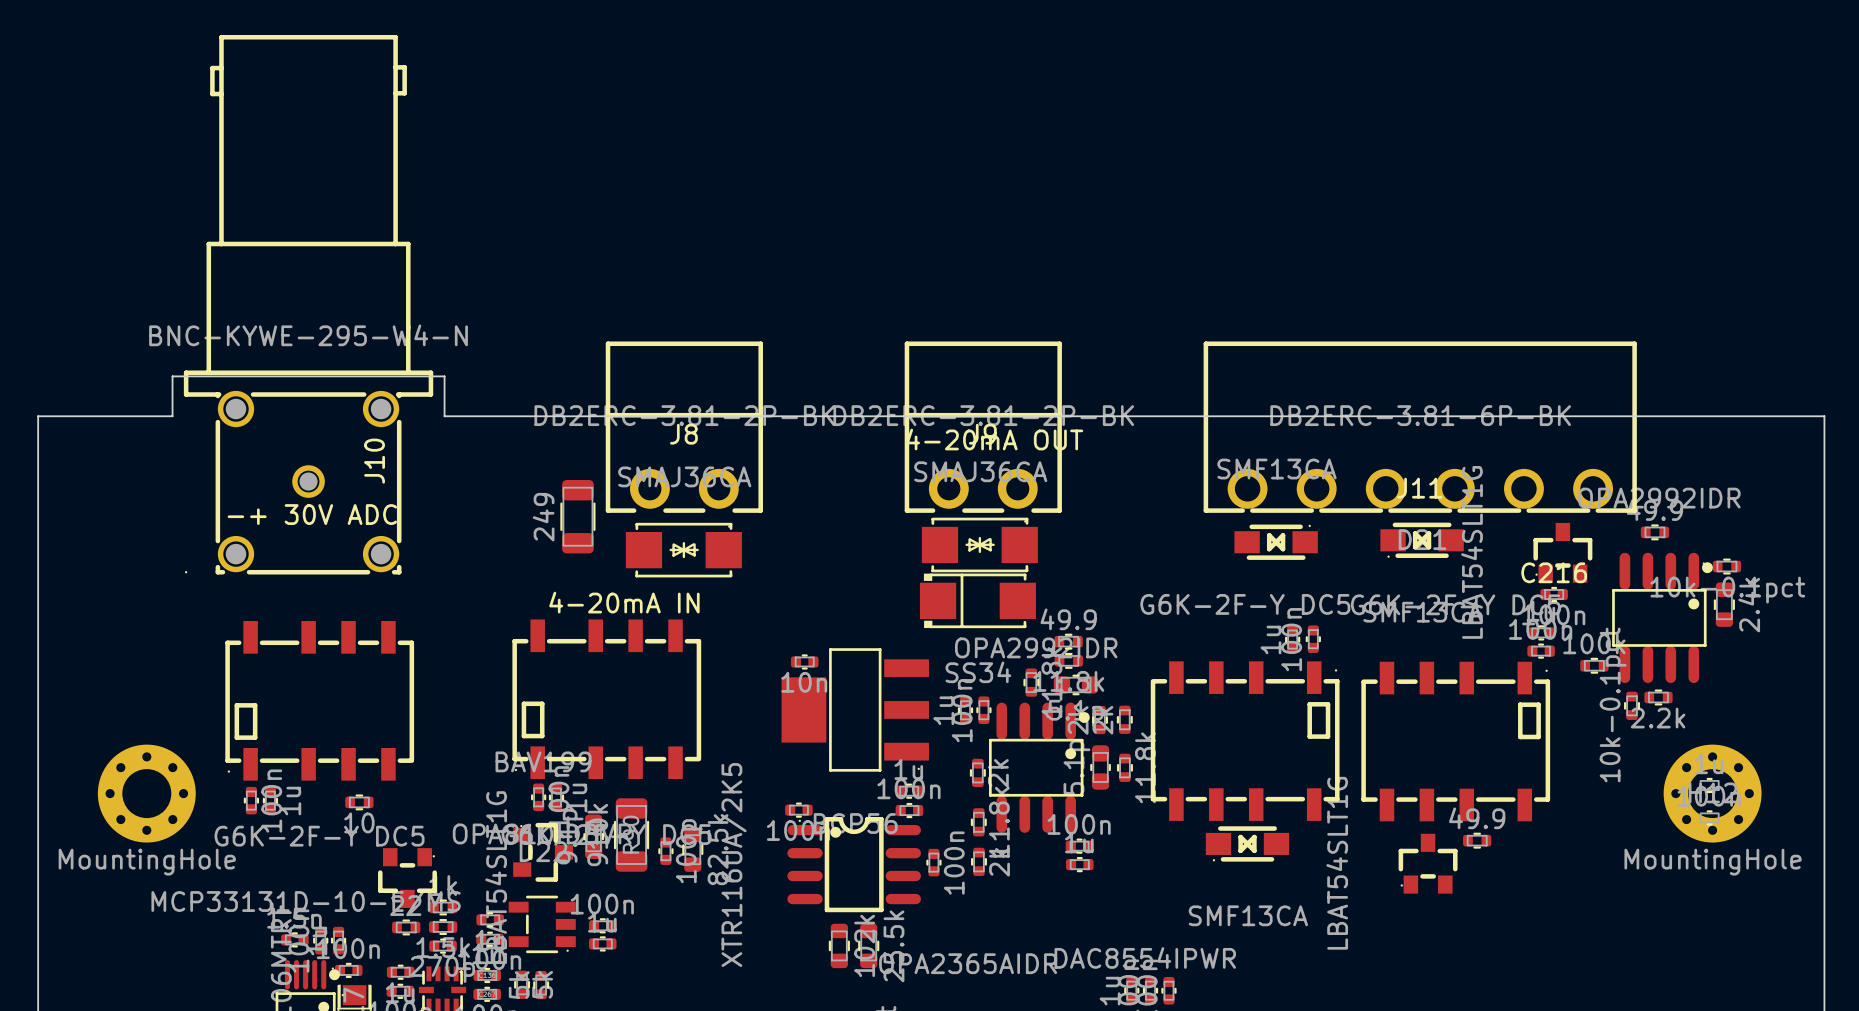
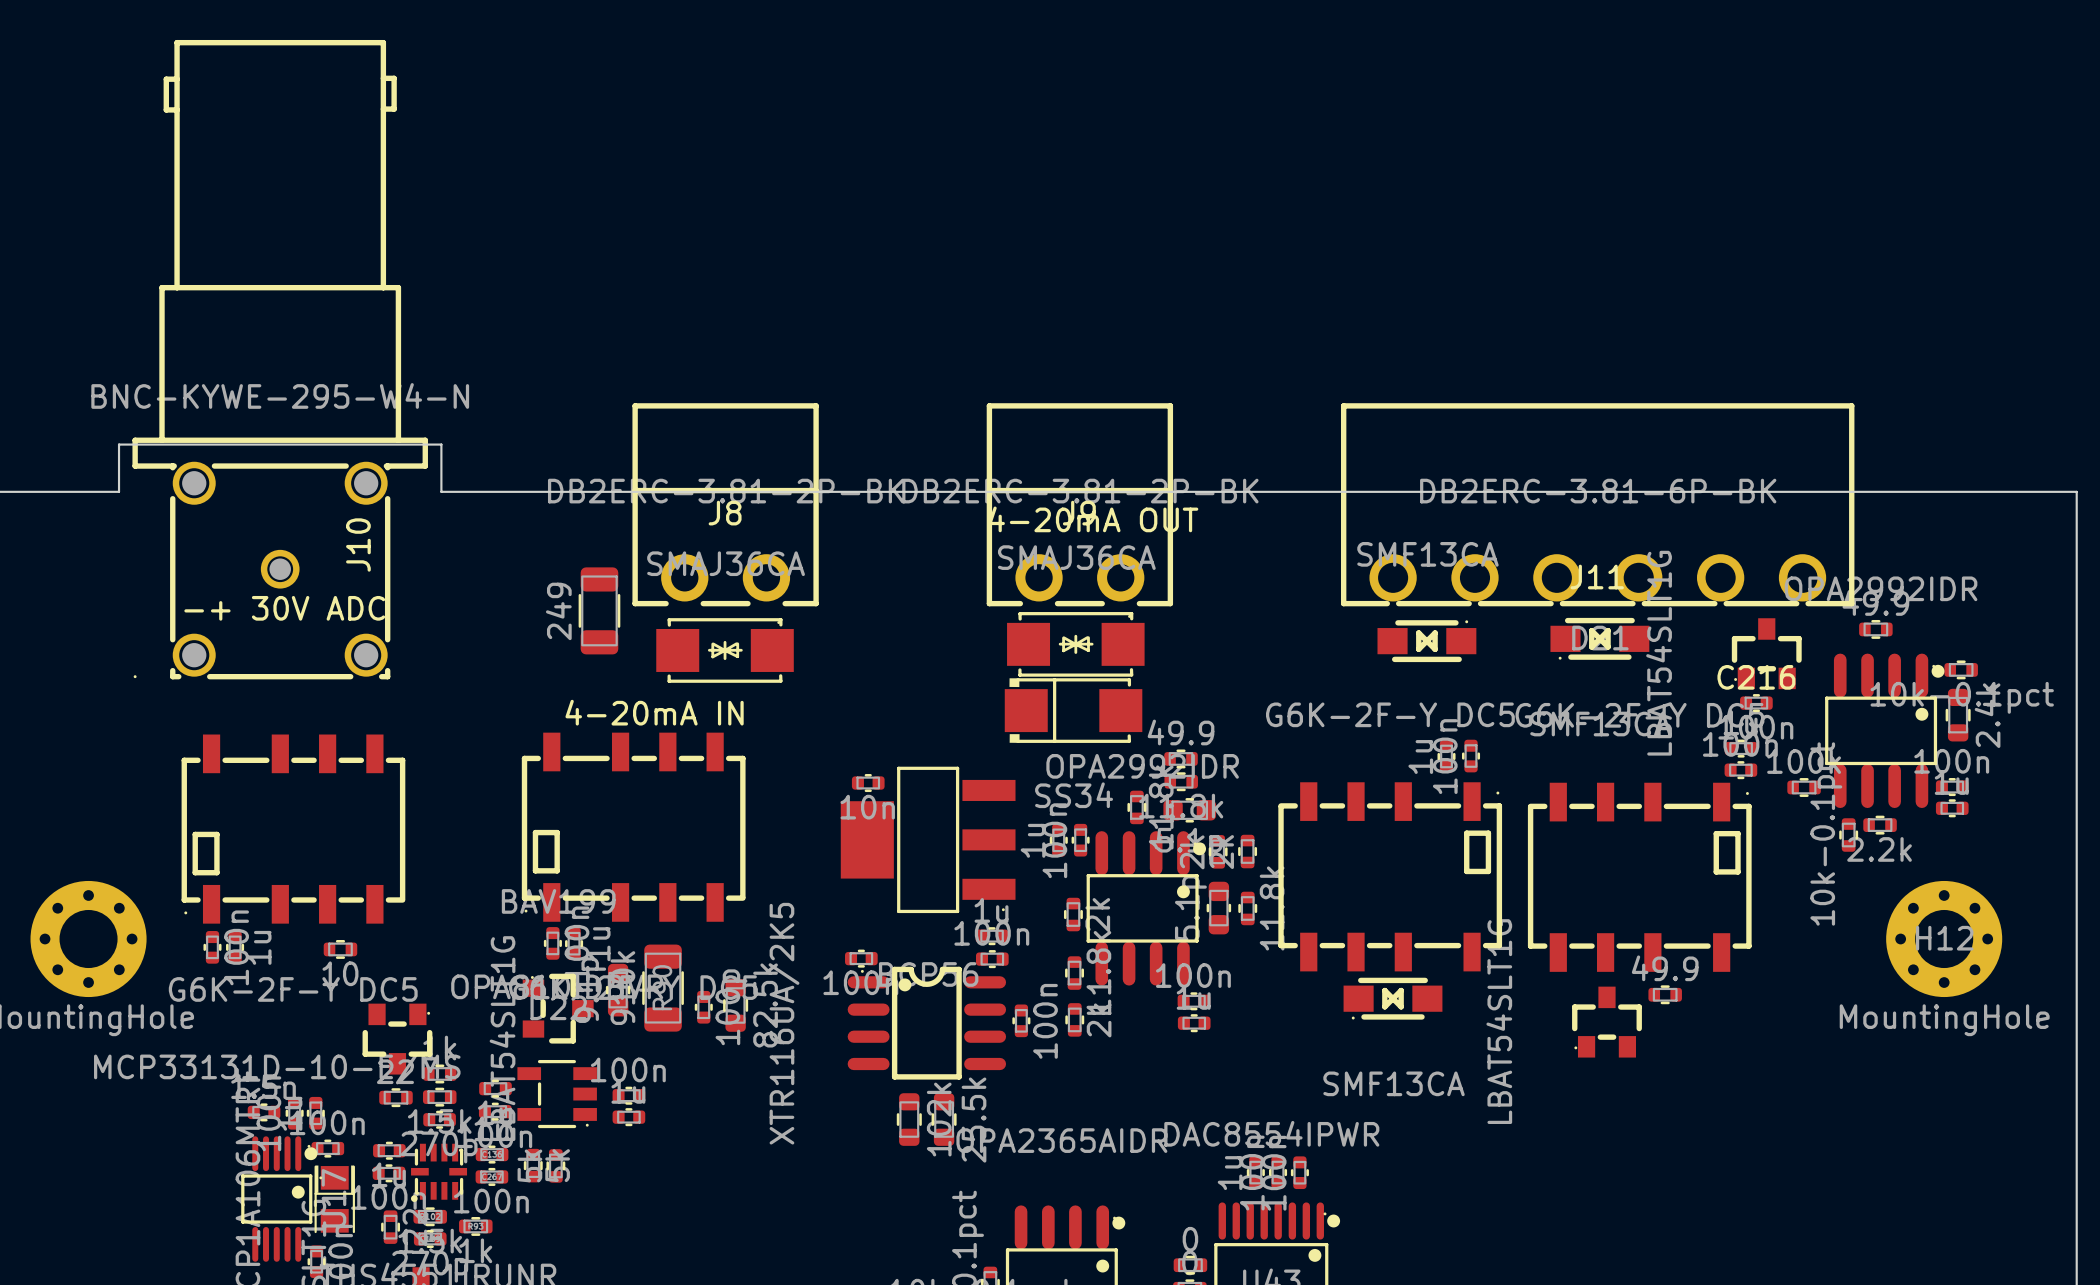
part position: (1709, 785) -> (1952, 808)
part position: (1709, 817) -> (1952, 787)

